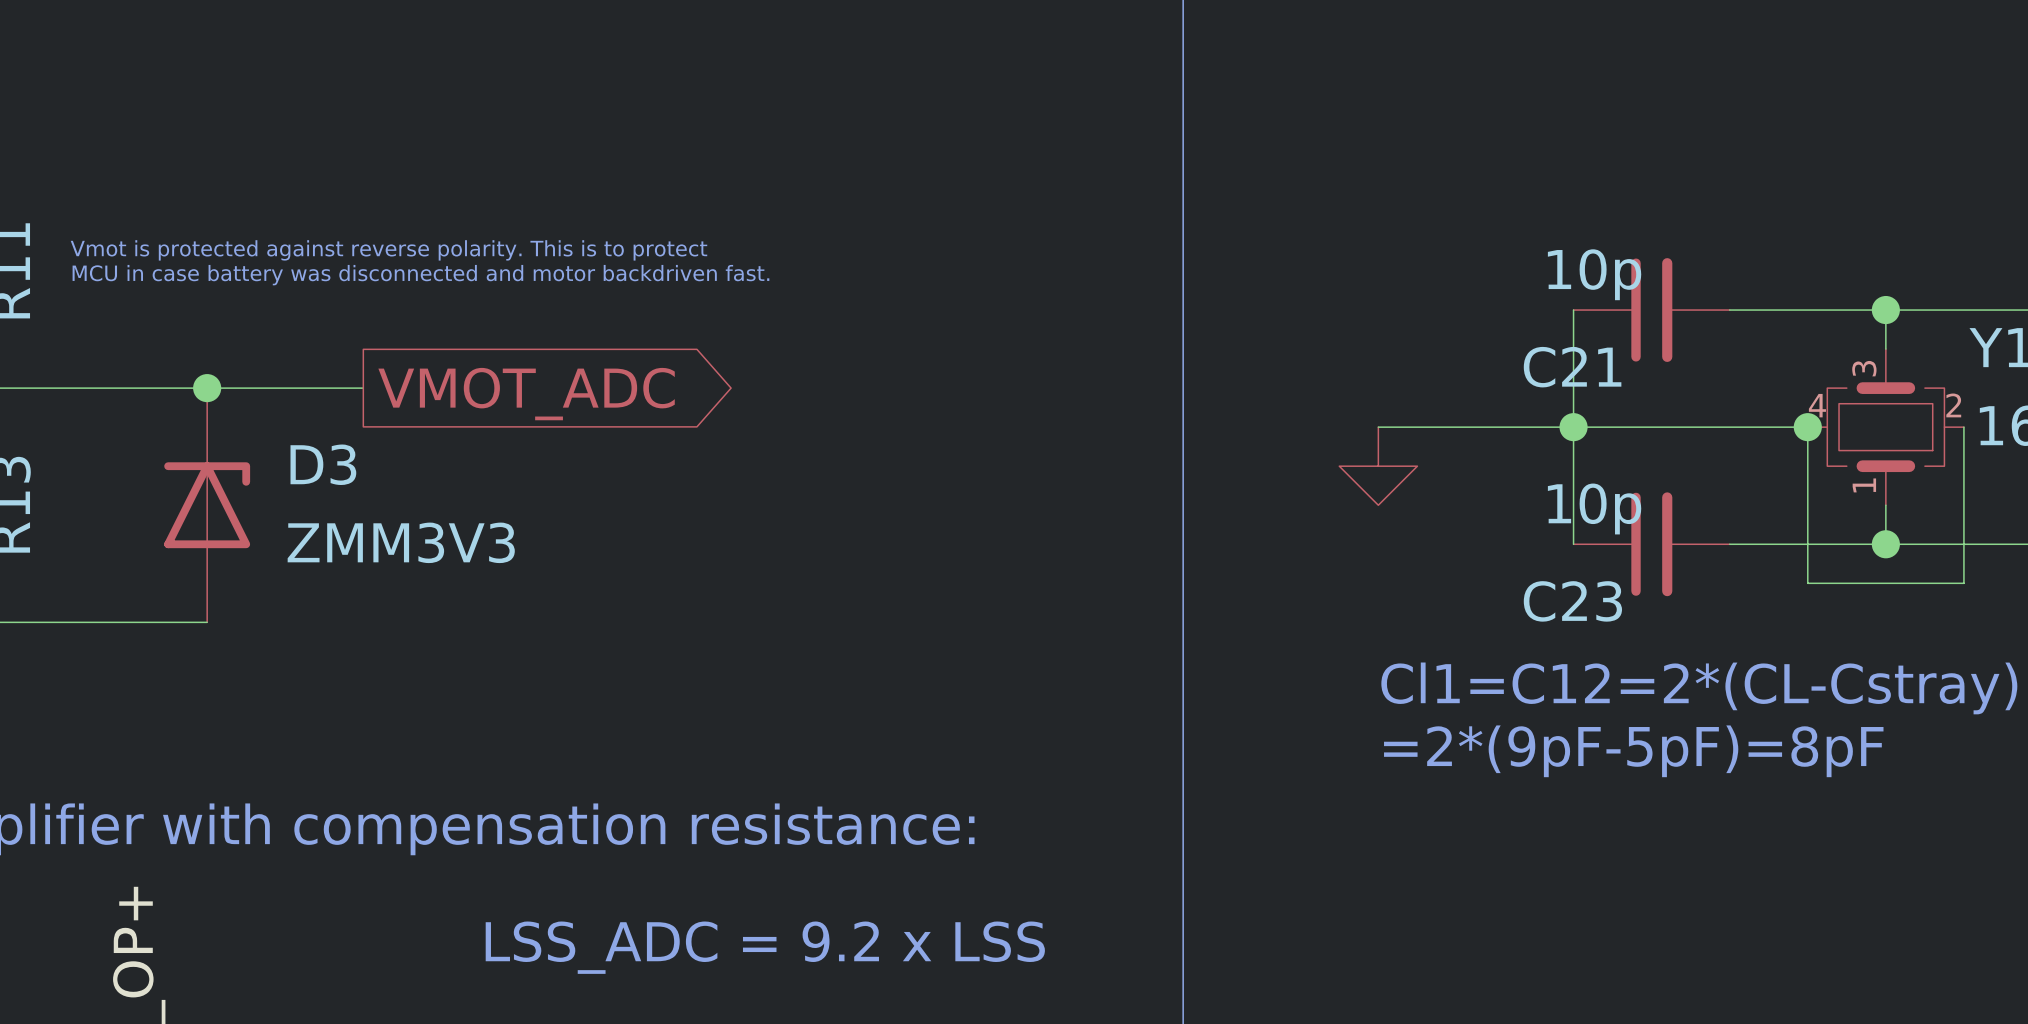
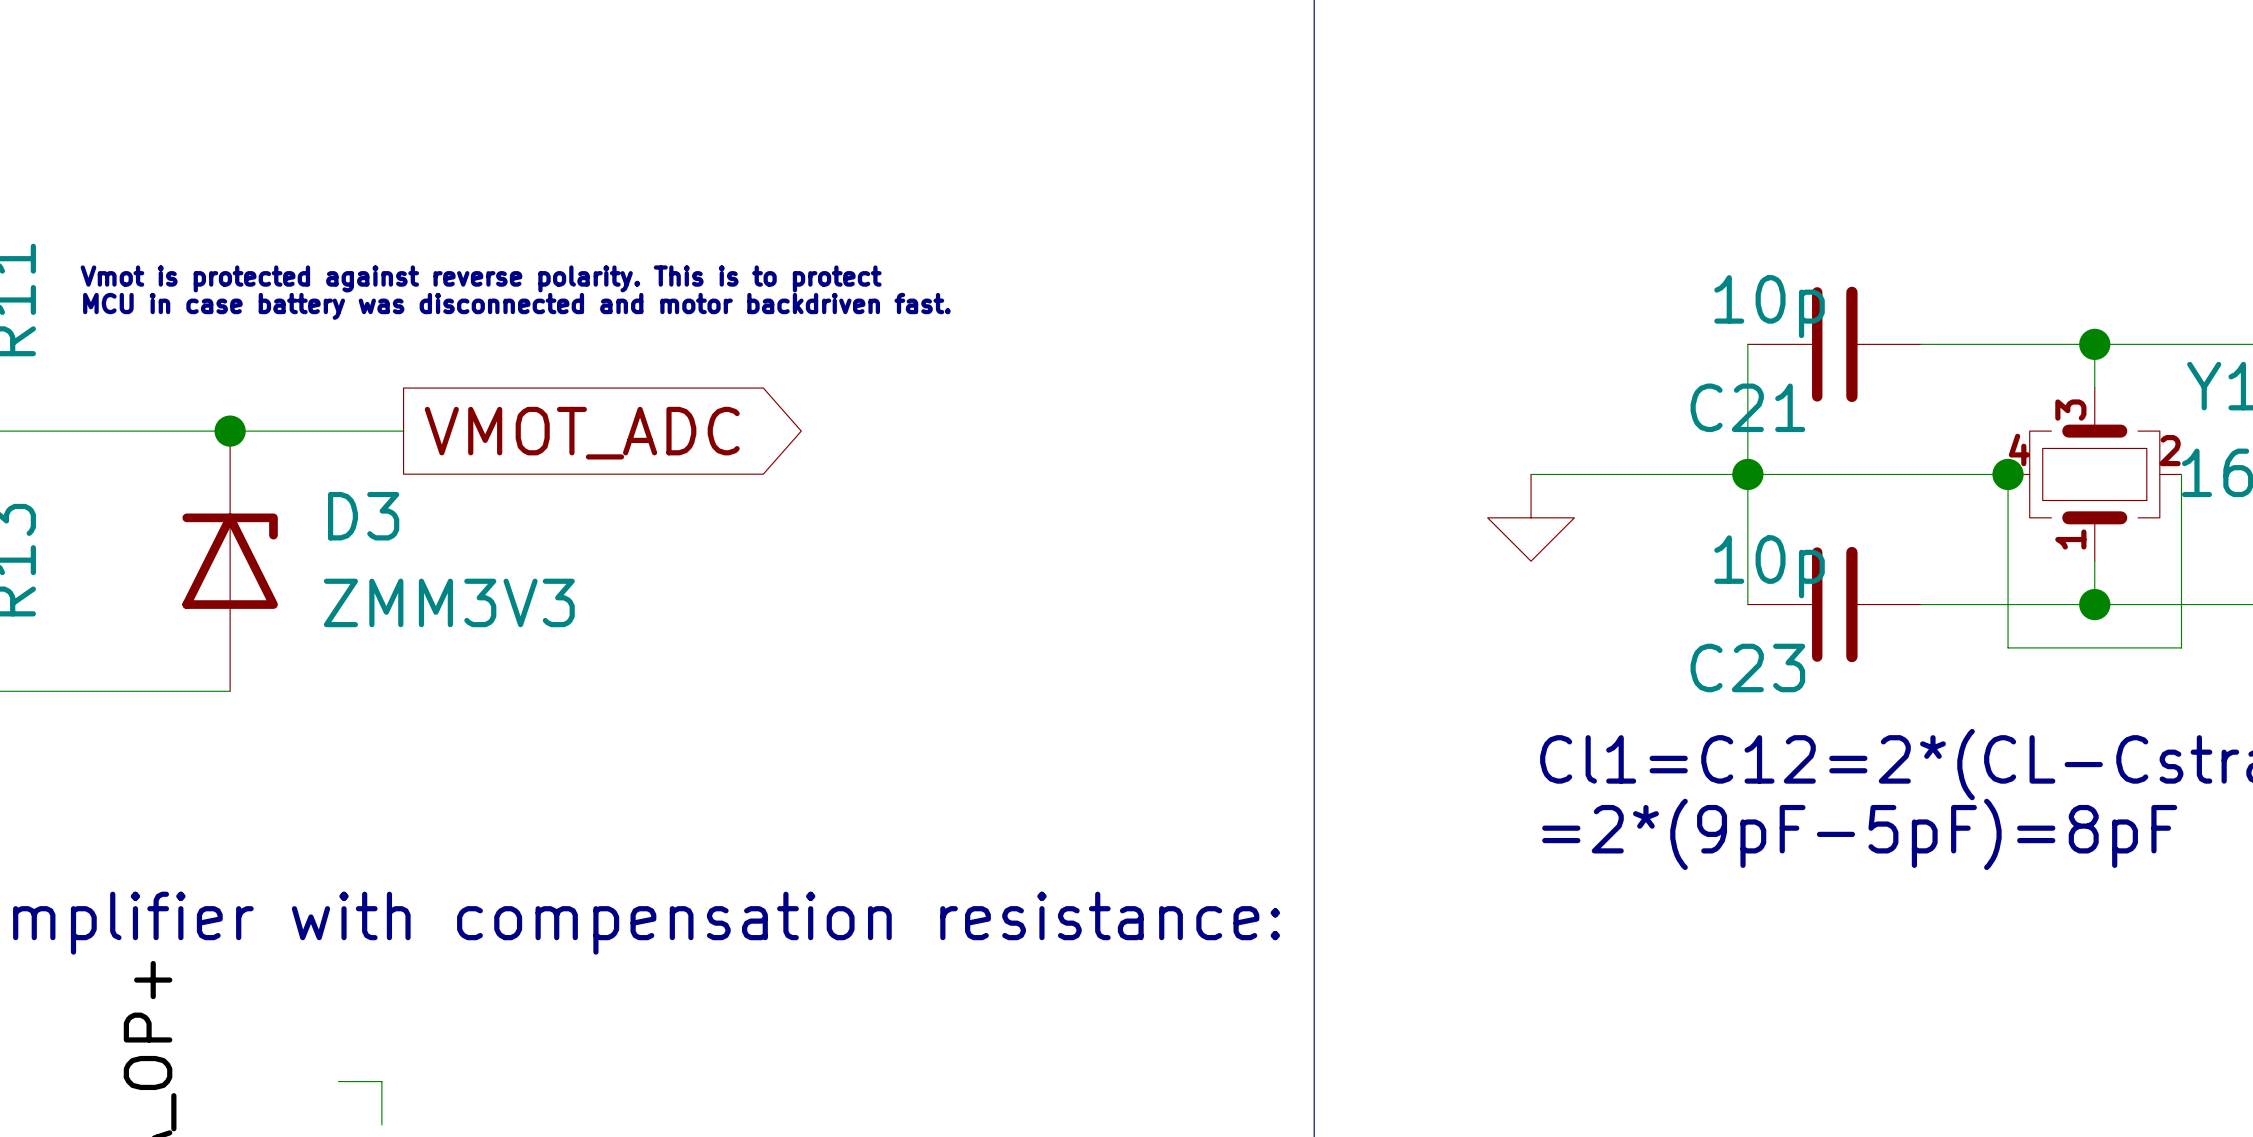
text: LSS_ADC = 9.2 x LSS (765, 947) -> none
wire: none -> (338, 1081) (381, 1081) (381, 1124)

